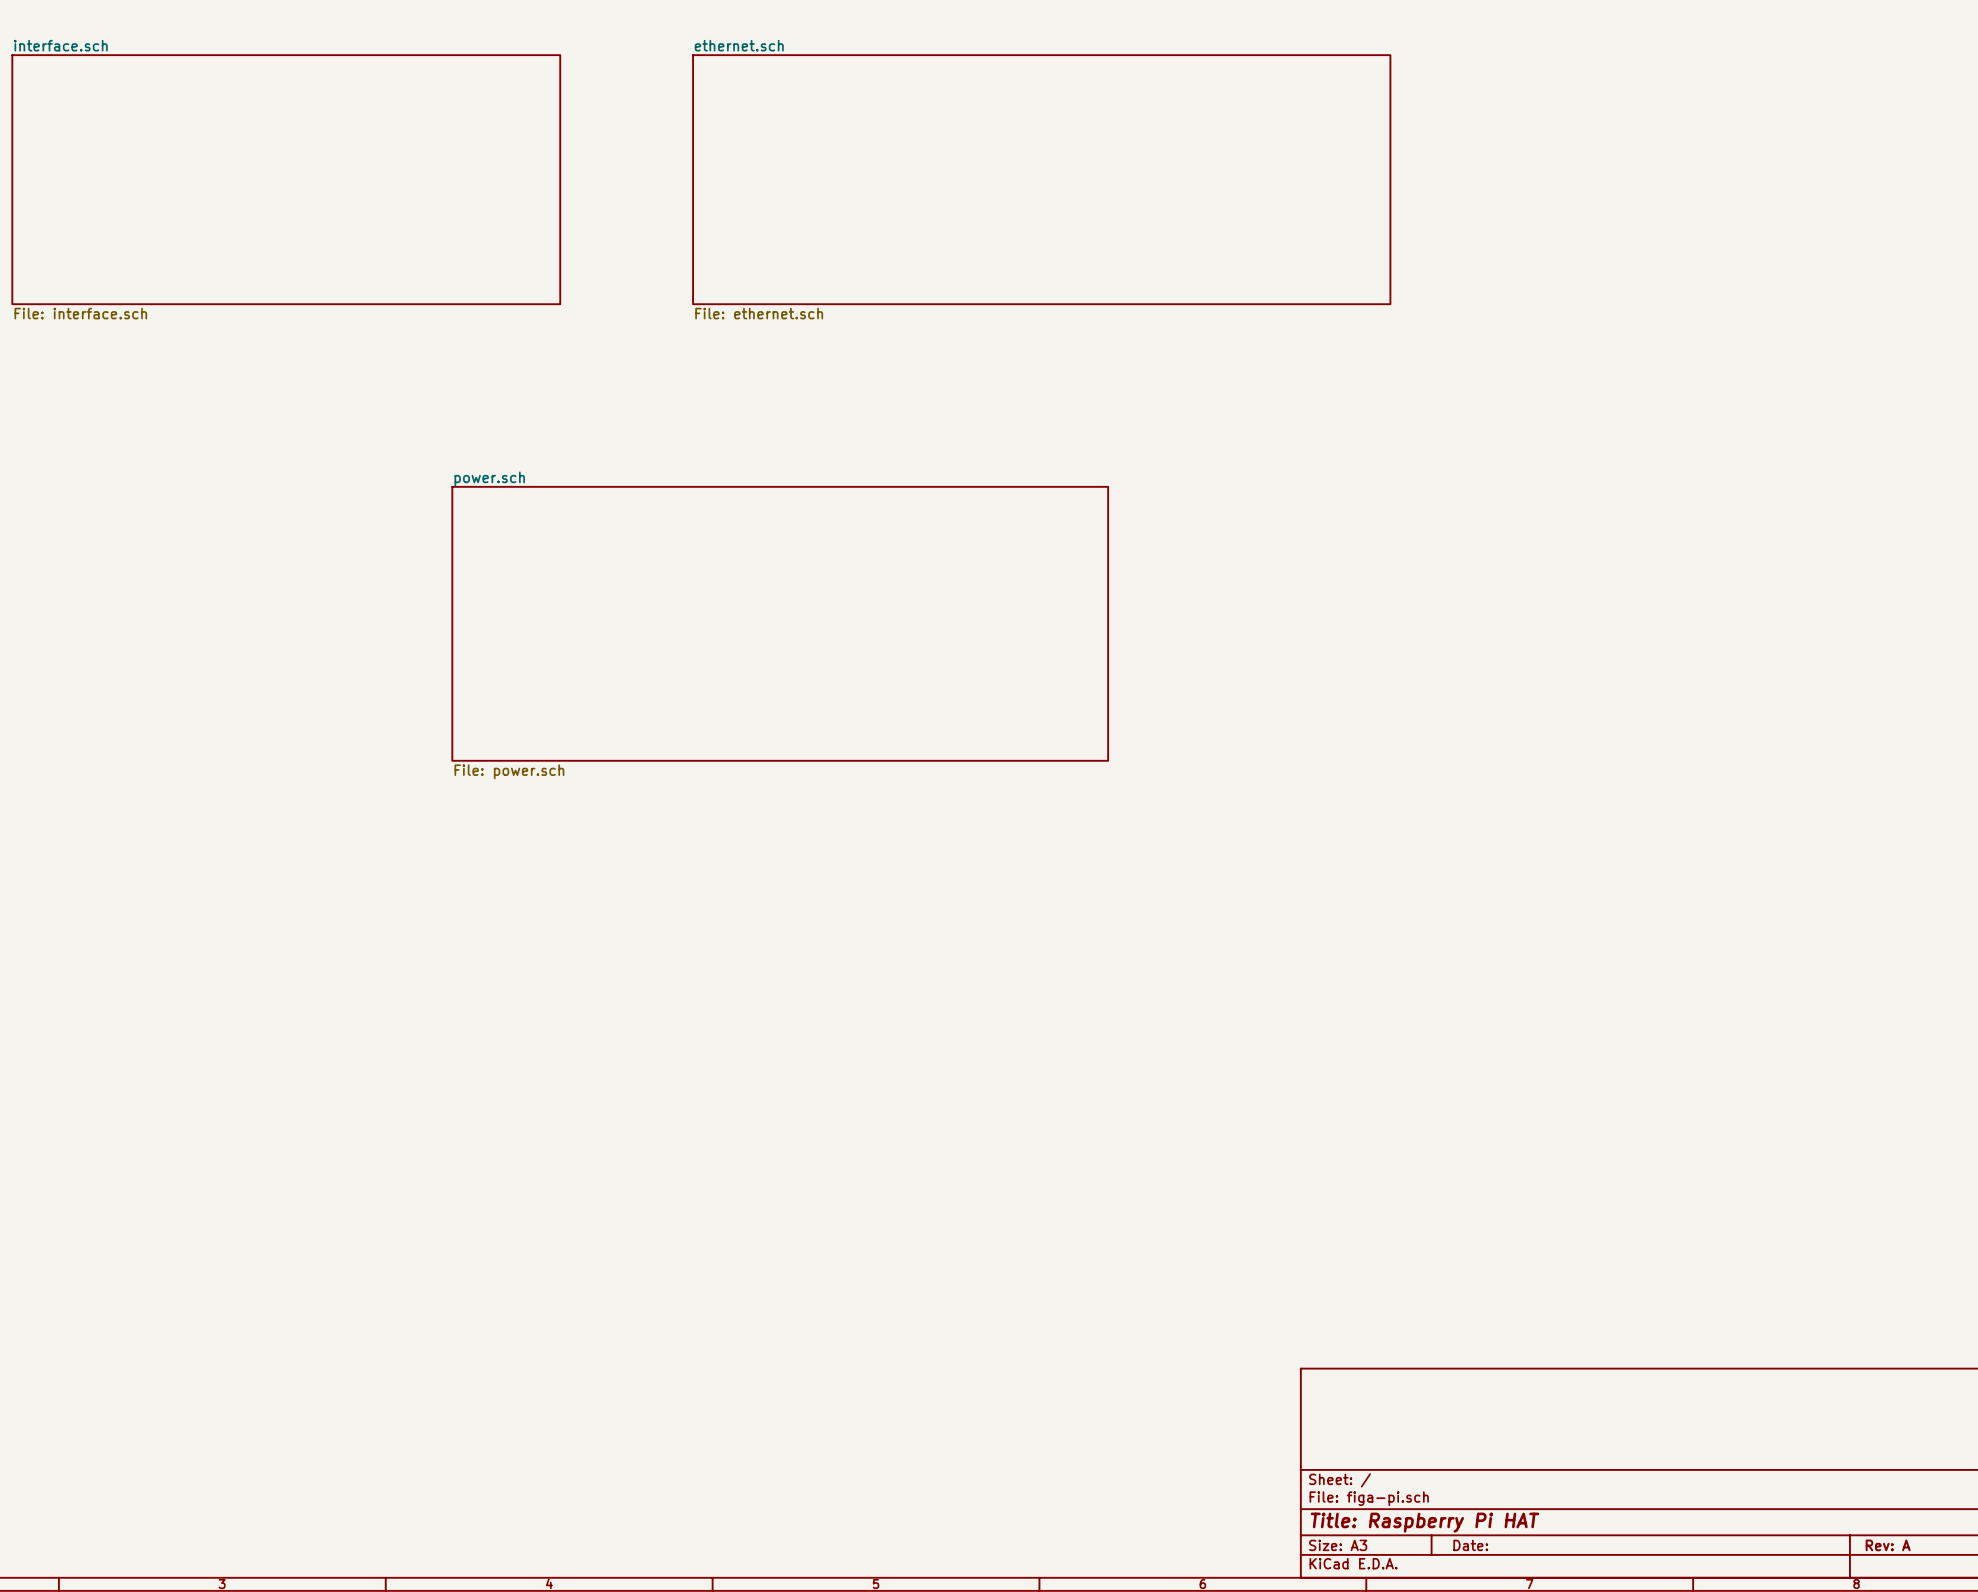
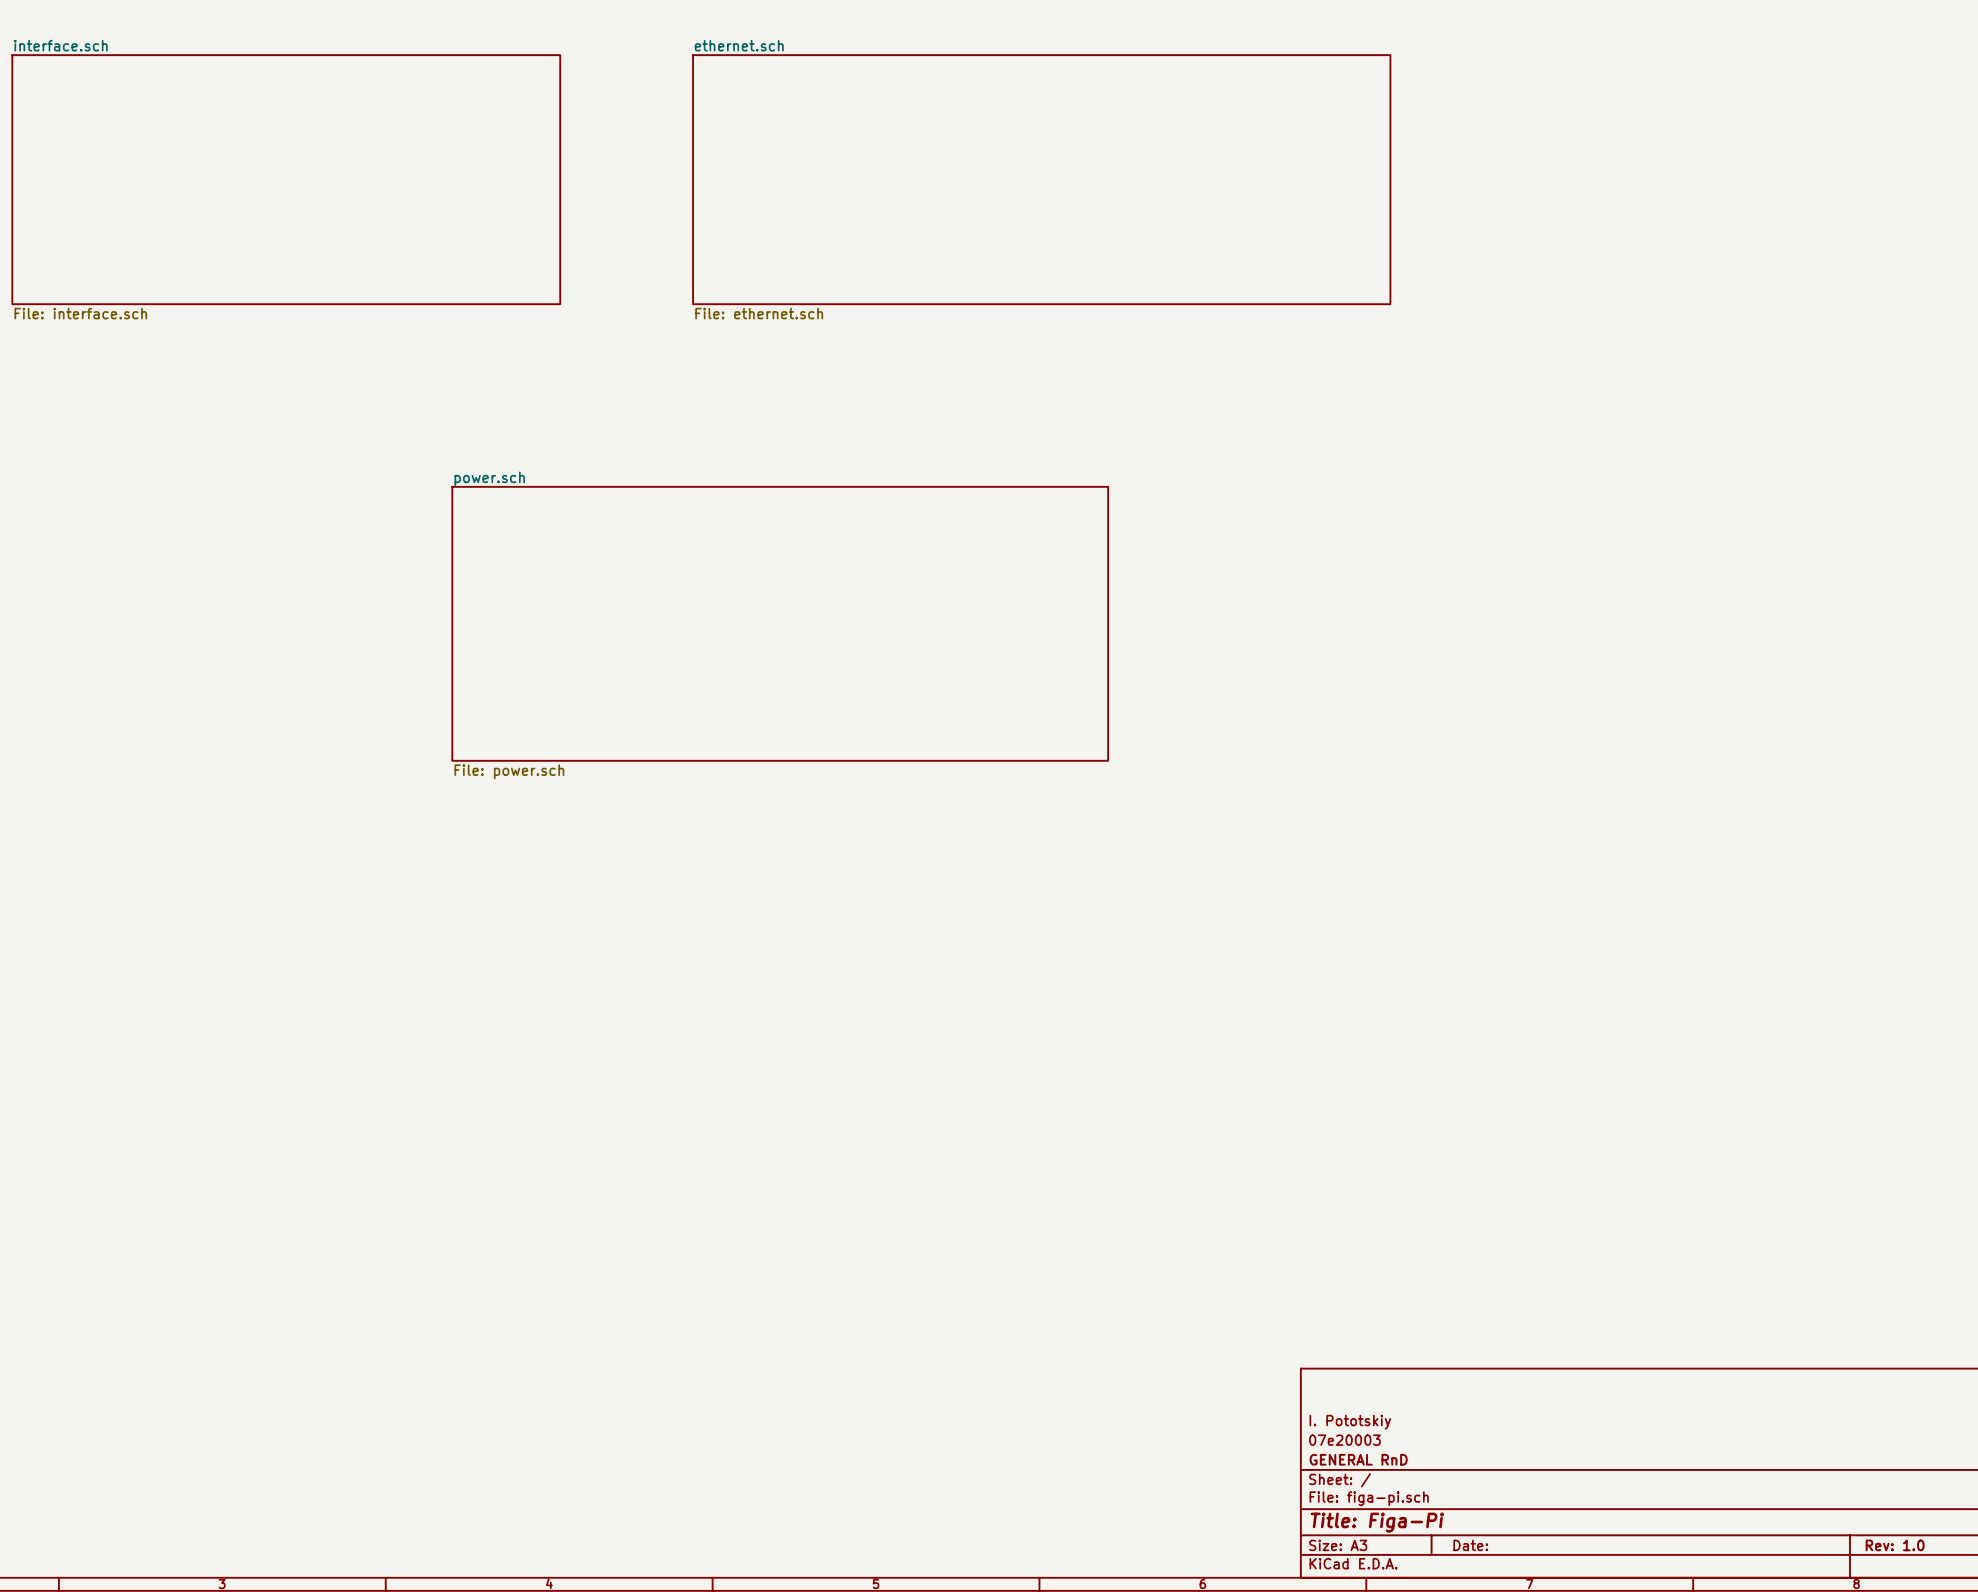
title block: none -> I. Pototskiy (1350, 1422)
title block: none -> 07e20003 (1344, 1440)
title block: none -> GENERAL RnD (1358, 1459)
title block: Title: Raspberry Pi HAT (1424, 1522) -> Title: Figa-Pi (1377, 1522)
title block: Rev: A (1888, 1545) -> Rev: 1.0 (1895, 1545)

